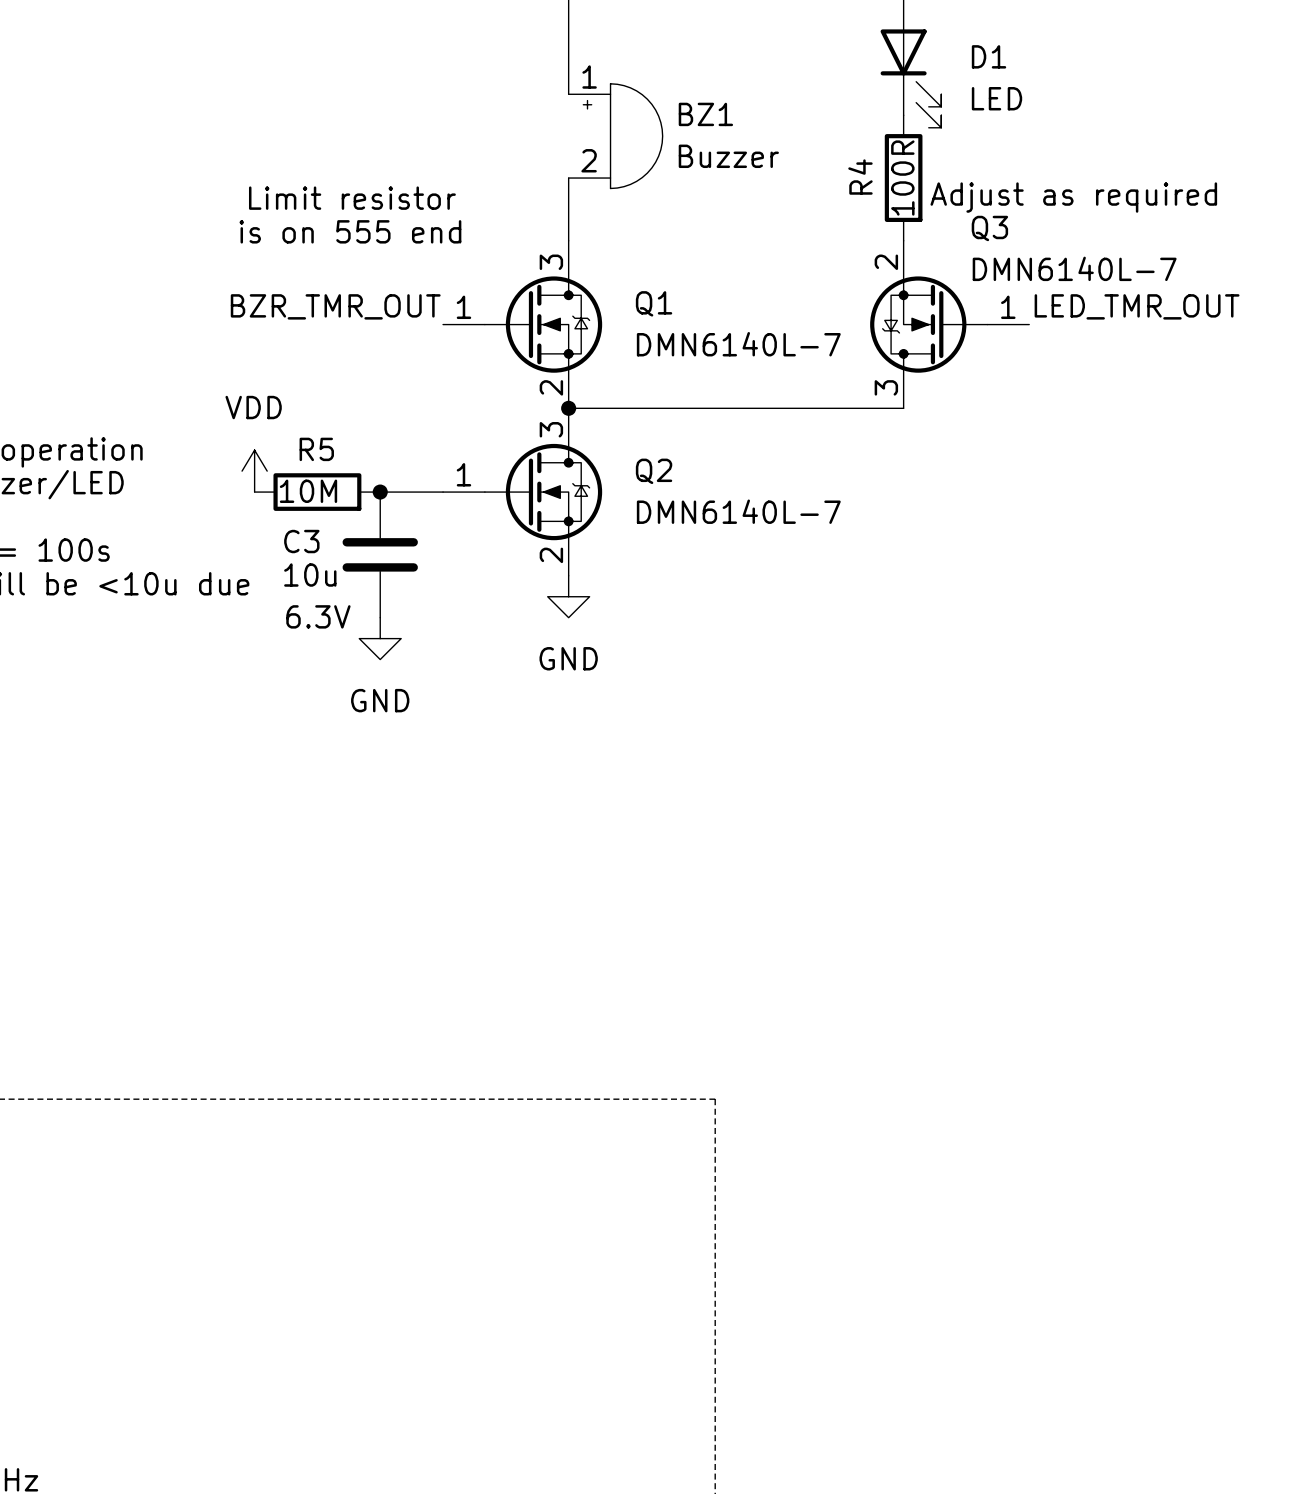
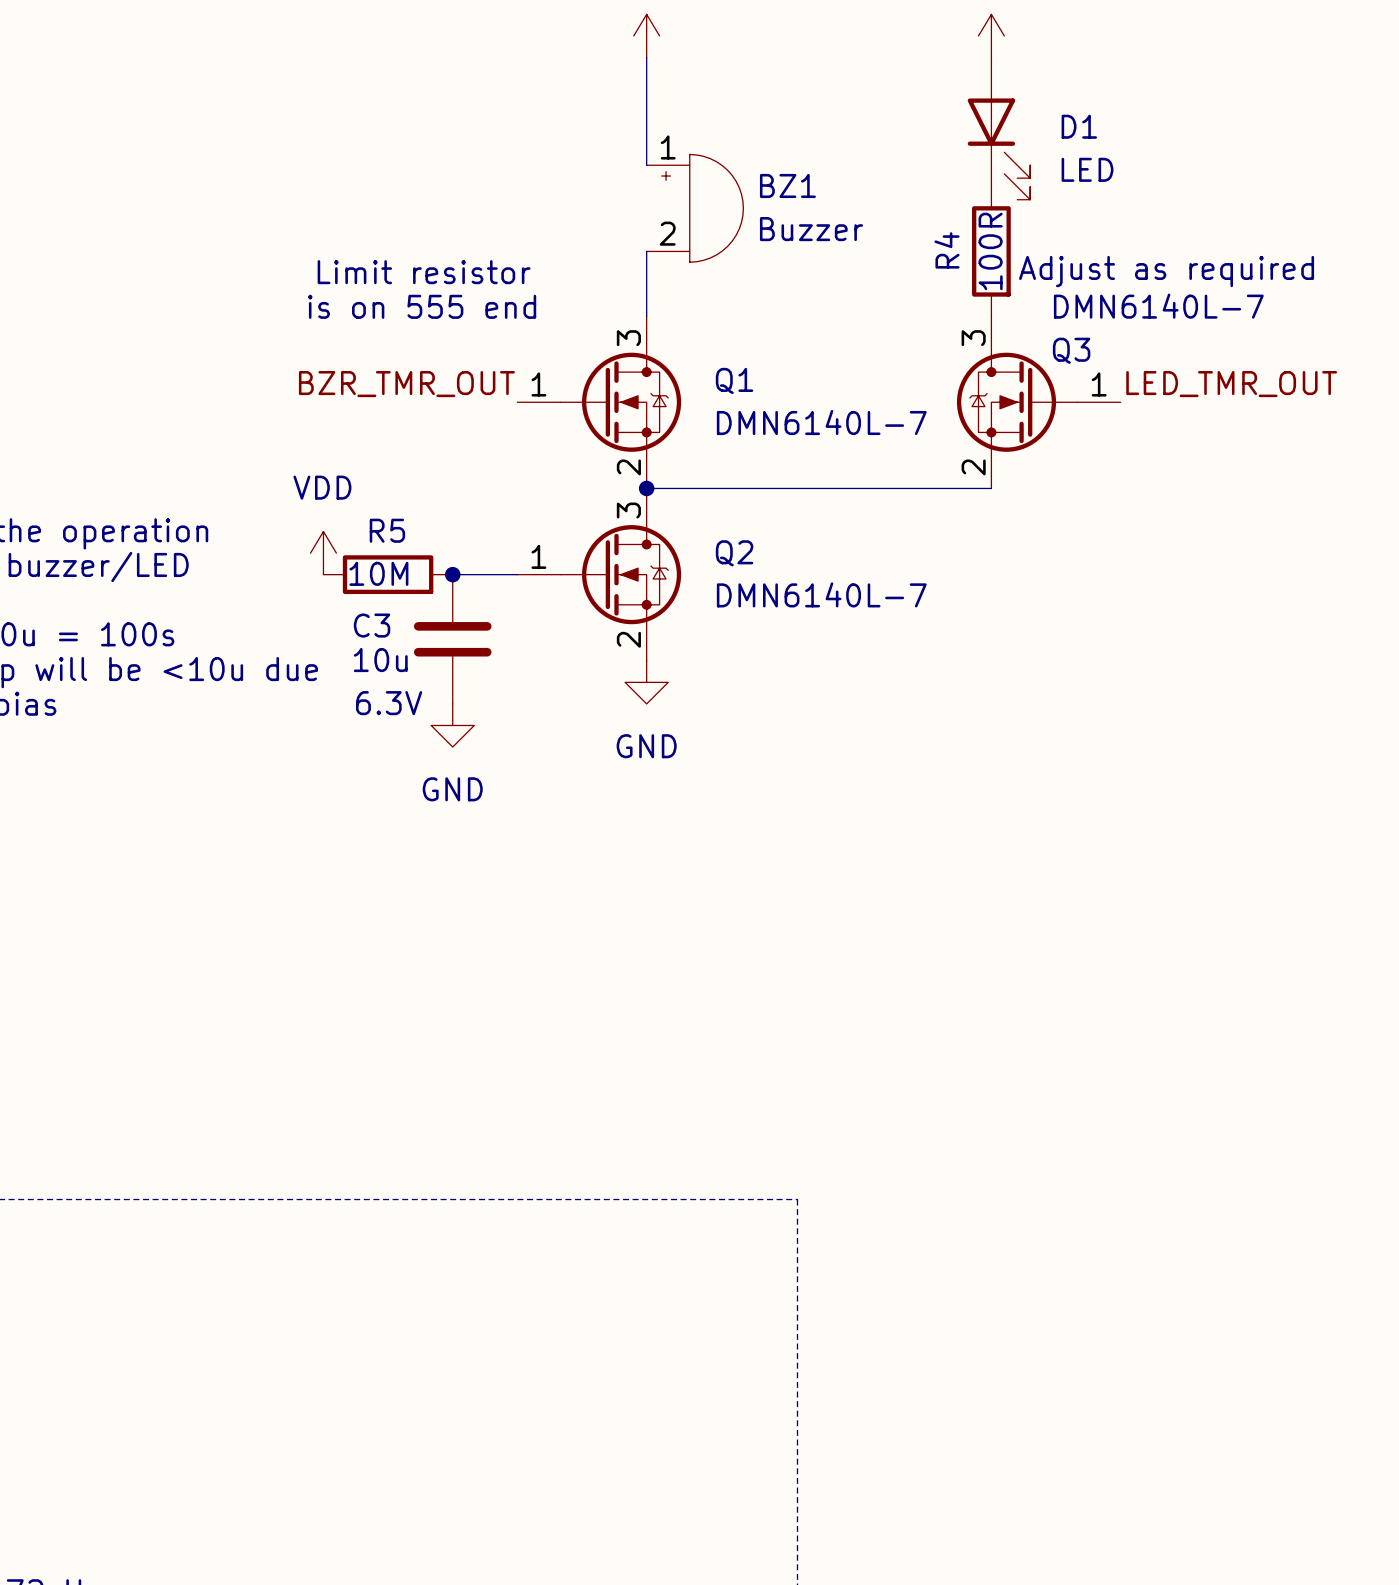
Q3 name position: Q3 (989, 228) -> Q3 (1071, 350)
Q3 value position: DMN6140L-7 (1074, 268) -> DMN6140L-7 (1158, 306)
Q3 flip: as is (928, 324) -> up-down (1017, 402)

